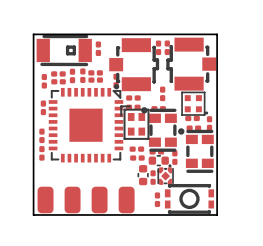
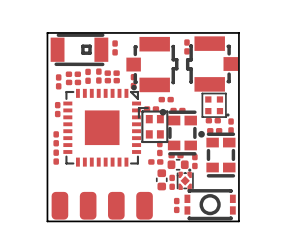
part: (158, 47) -> none
part: (162, 93) -> none
part: (133, 97) -> none
part: none -> (166, 99)
part rotation: 0° (136, 149) -> 90° clockwise (159, 148)

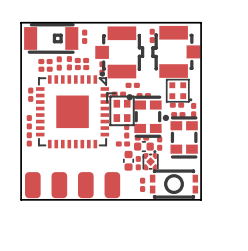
part: (58, 81) -> none

